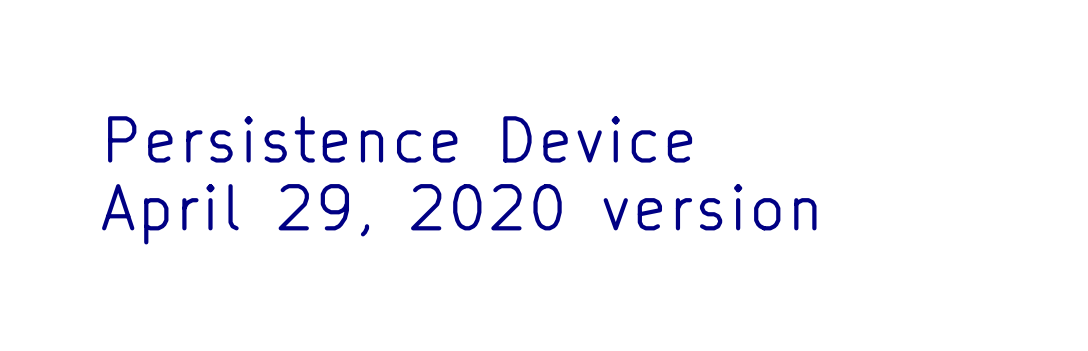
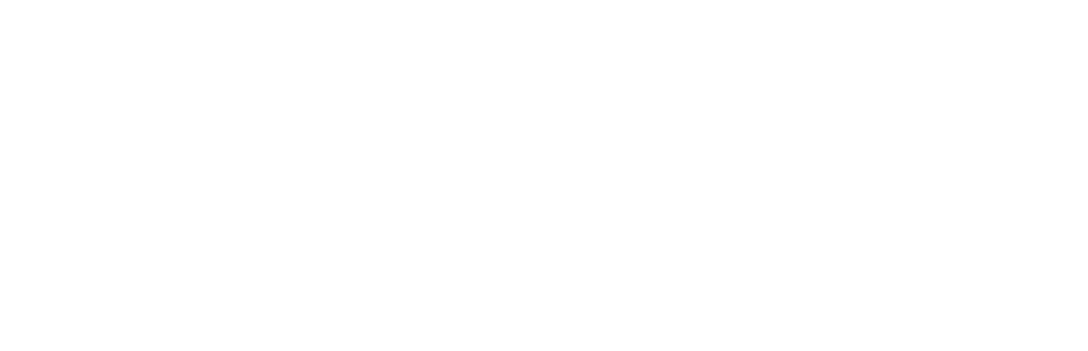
text: Persistence Device (400, 139) -> none
text: April 29, 2020 version (459, 214) -> none

